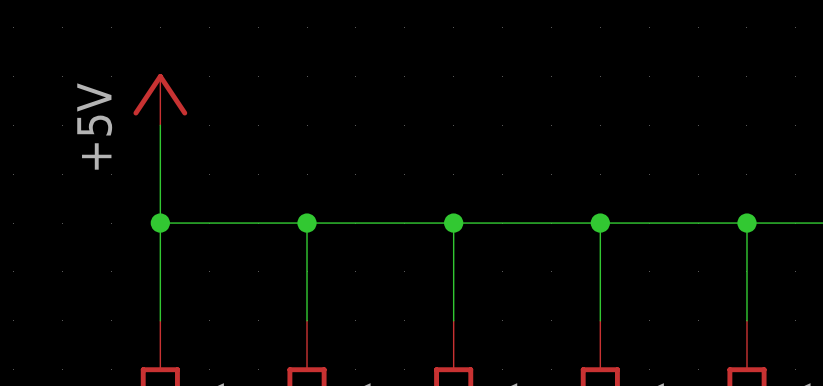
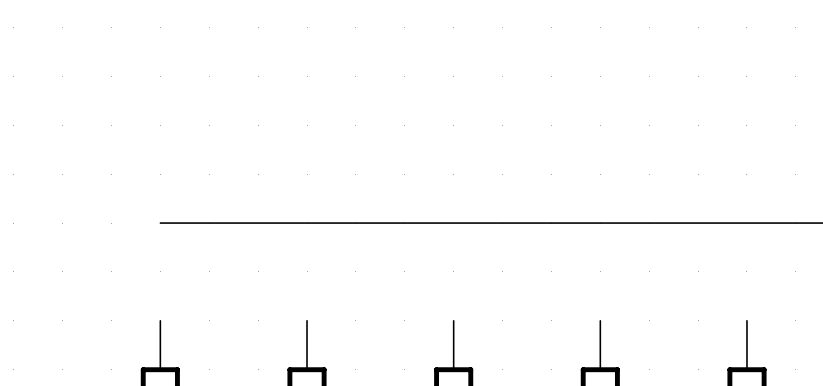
power symbol: +5V (160, 99) -> none
wire: (160, 125) (160, 320) -> none
junction: (160, 223) -> none
wire: (307, 223) (307, 320) -> none
junction: (307, 223) -> none
wire: (453, 223) (453, 320) -> none
junction: (453, 223) -> none
wire: (600, 223) (600, 320) -> none
junction: (600, 223) -> none
wire: (746, 223) (746, 320) -> none
junction: (746, 223) -> none

